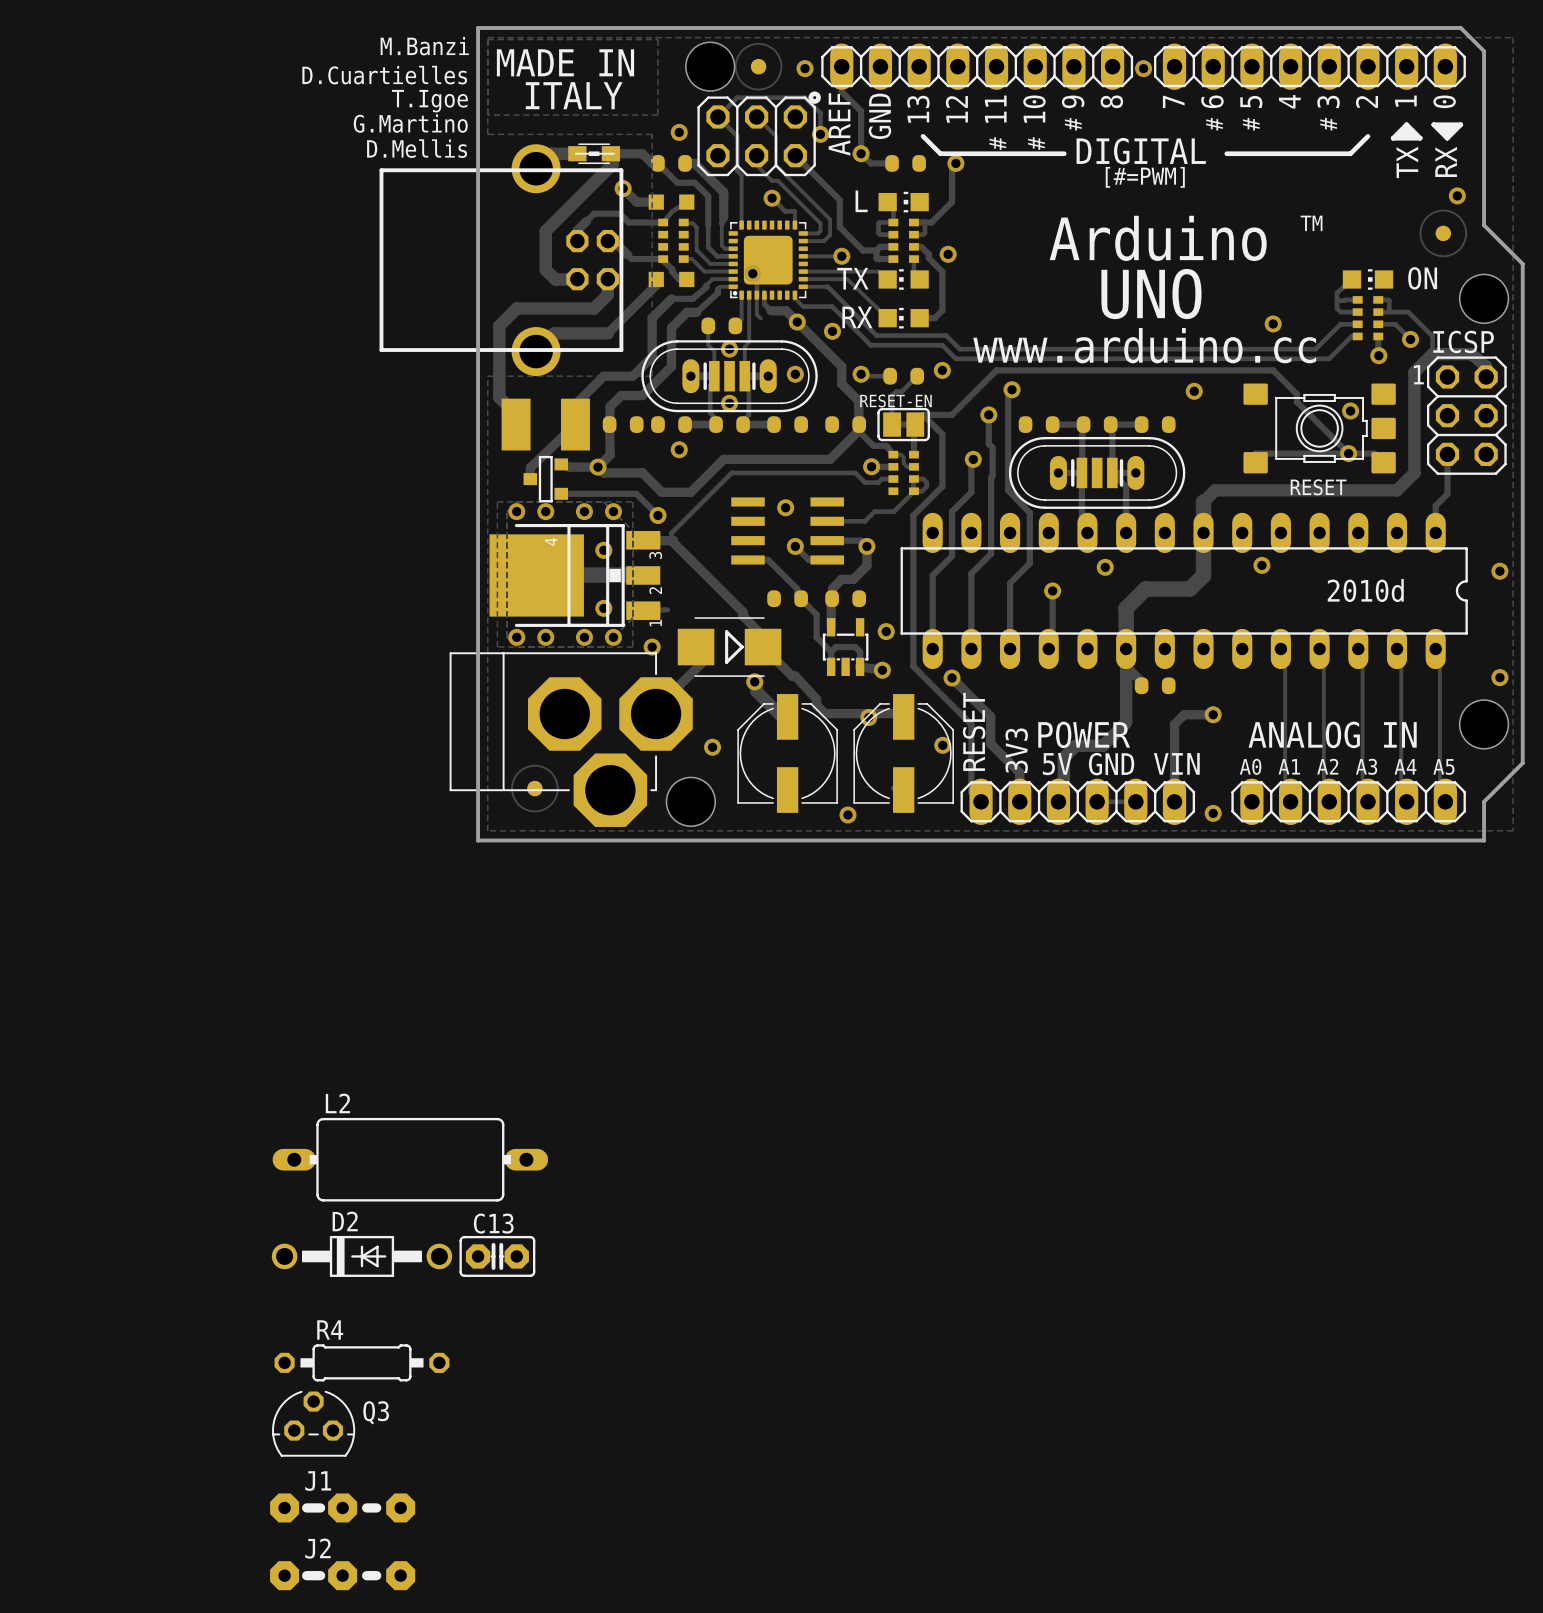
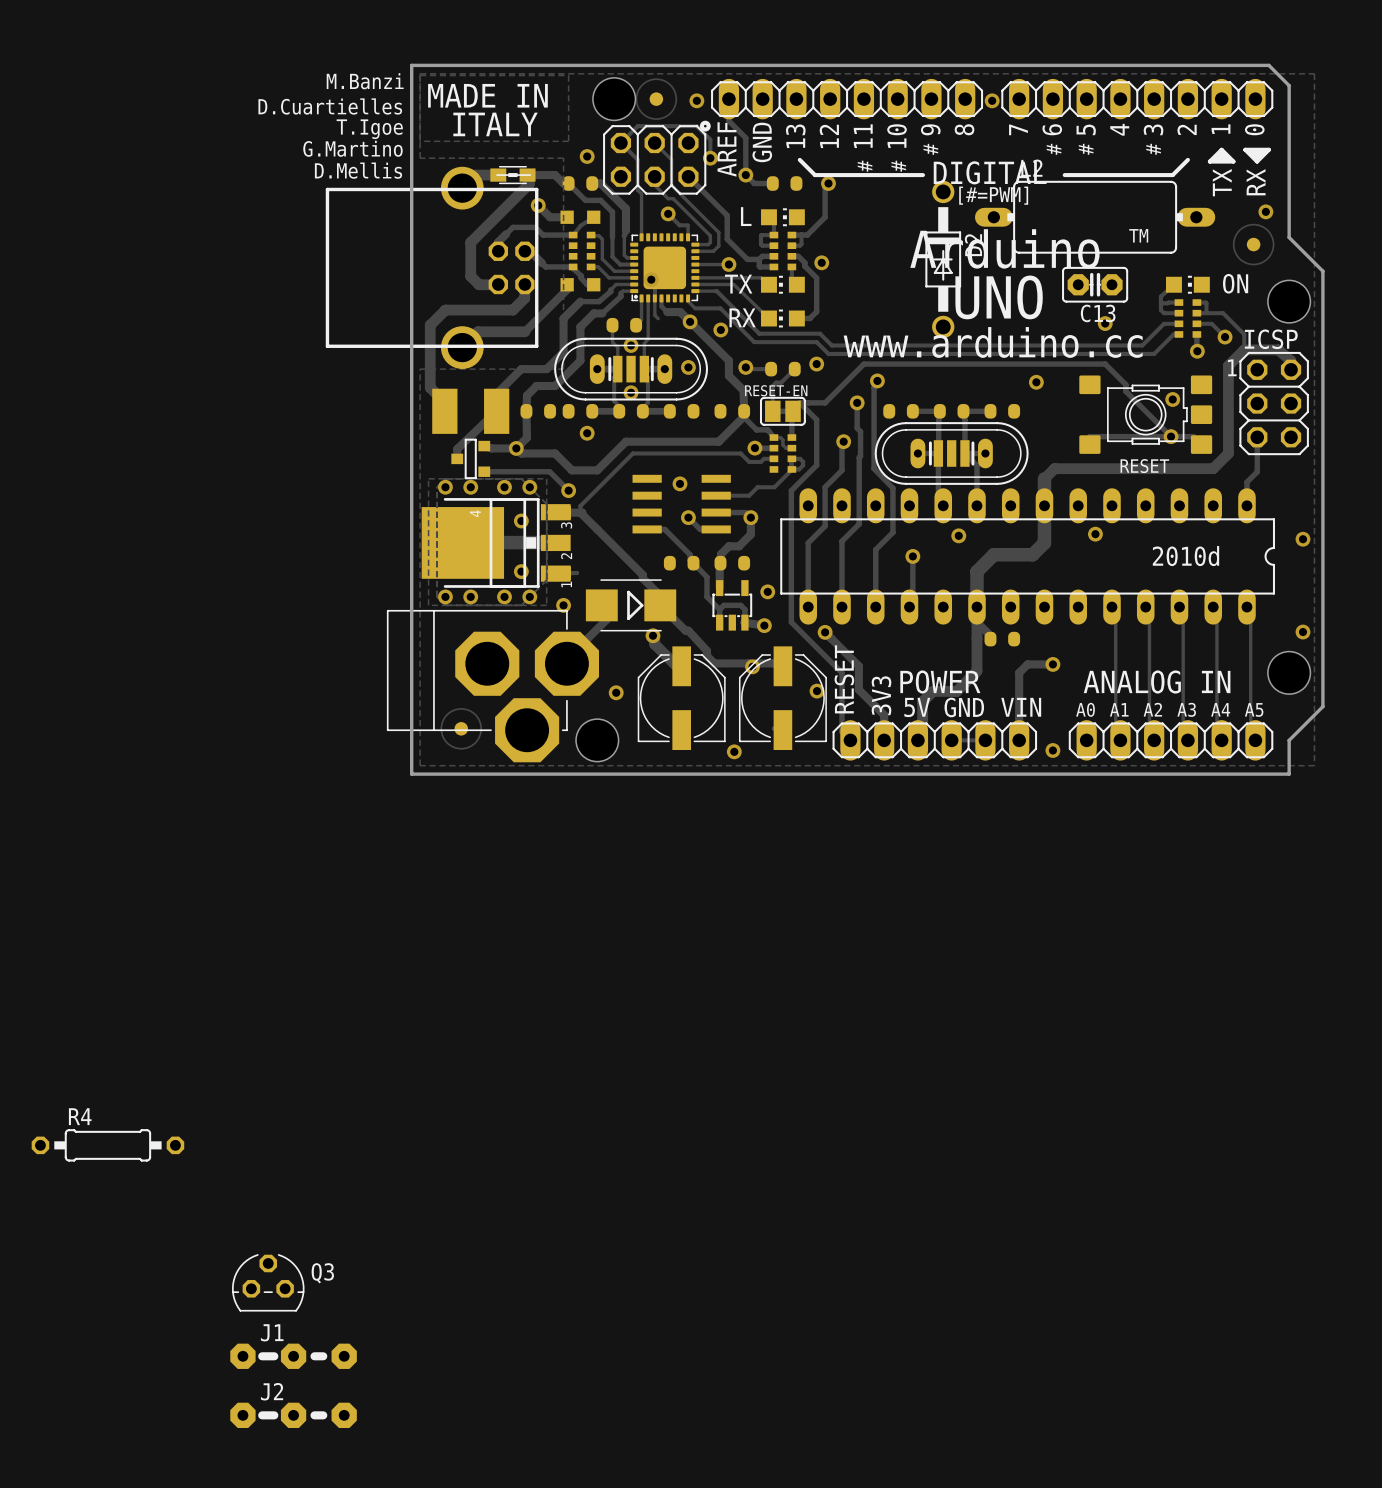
L2 position: (410, 1159) -> (1095, 217)
C13 name position: C13 (493, 1223) -> C13 (1098, 313)
D2 rotation: 0° (361, 1256) -> 90° clockwise (943, 259)
D2 position: (361, 1256) -> (943, 259)
C13 position: (497, 1256) -> (1095, 284)
R4 position: (361, 1362) -> (107, 1145)

